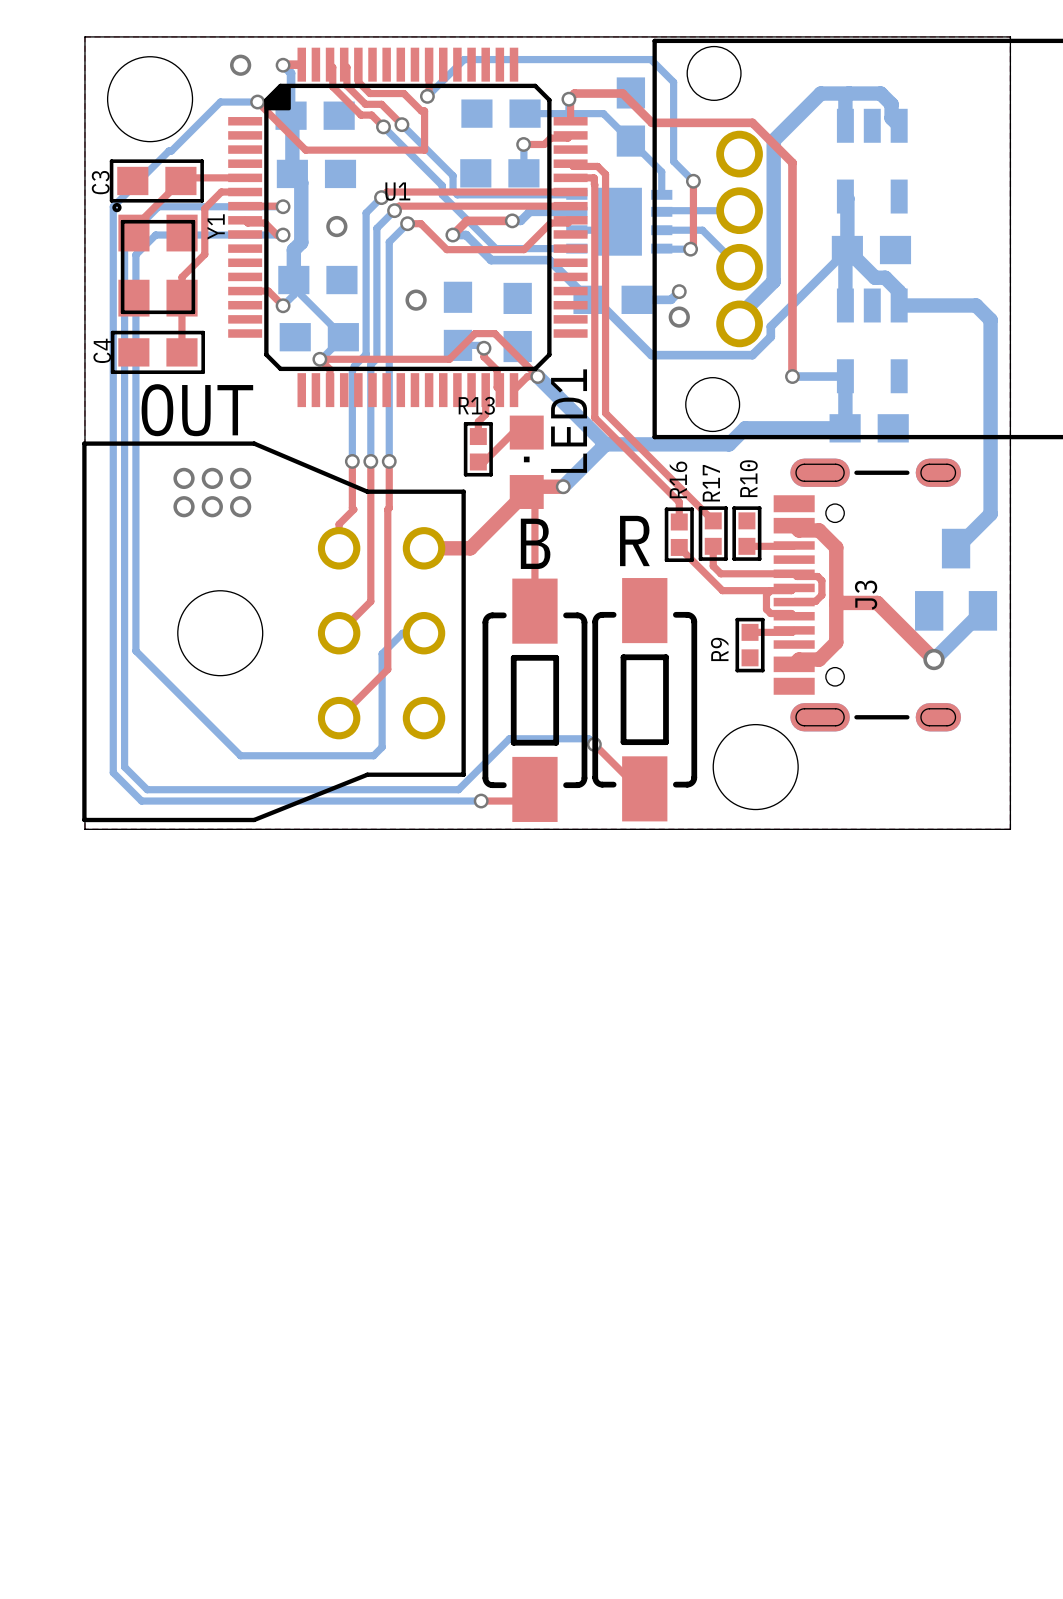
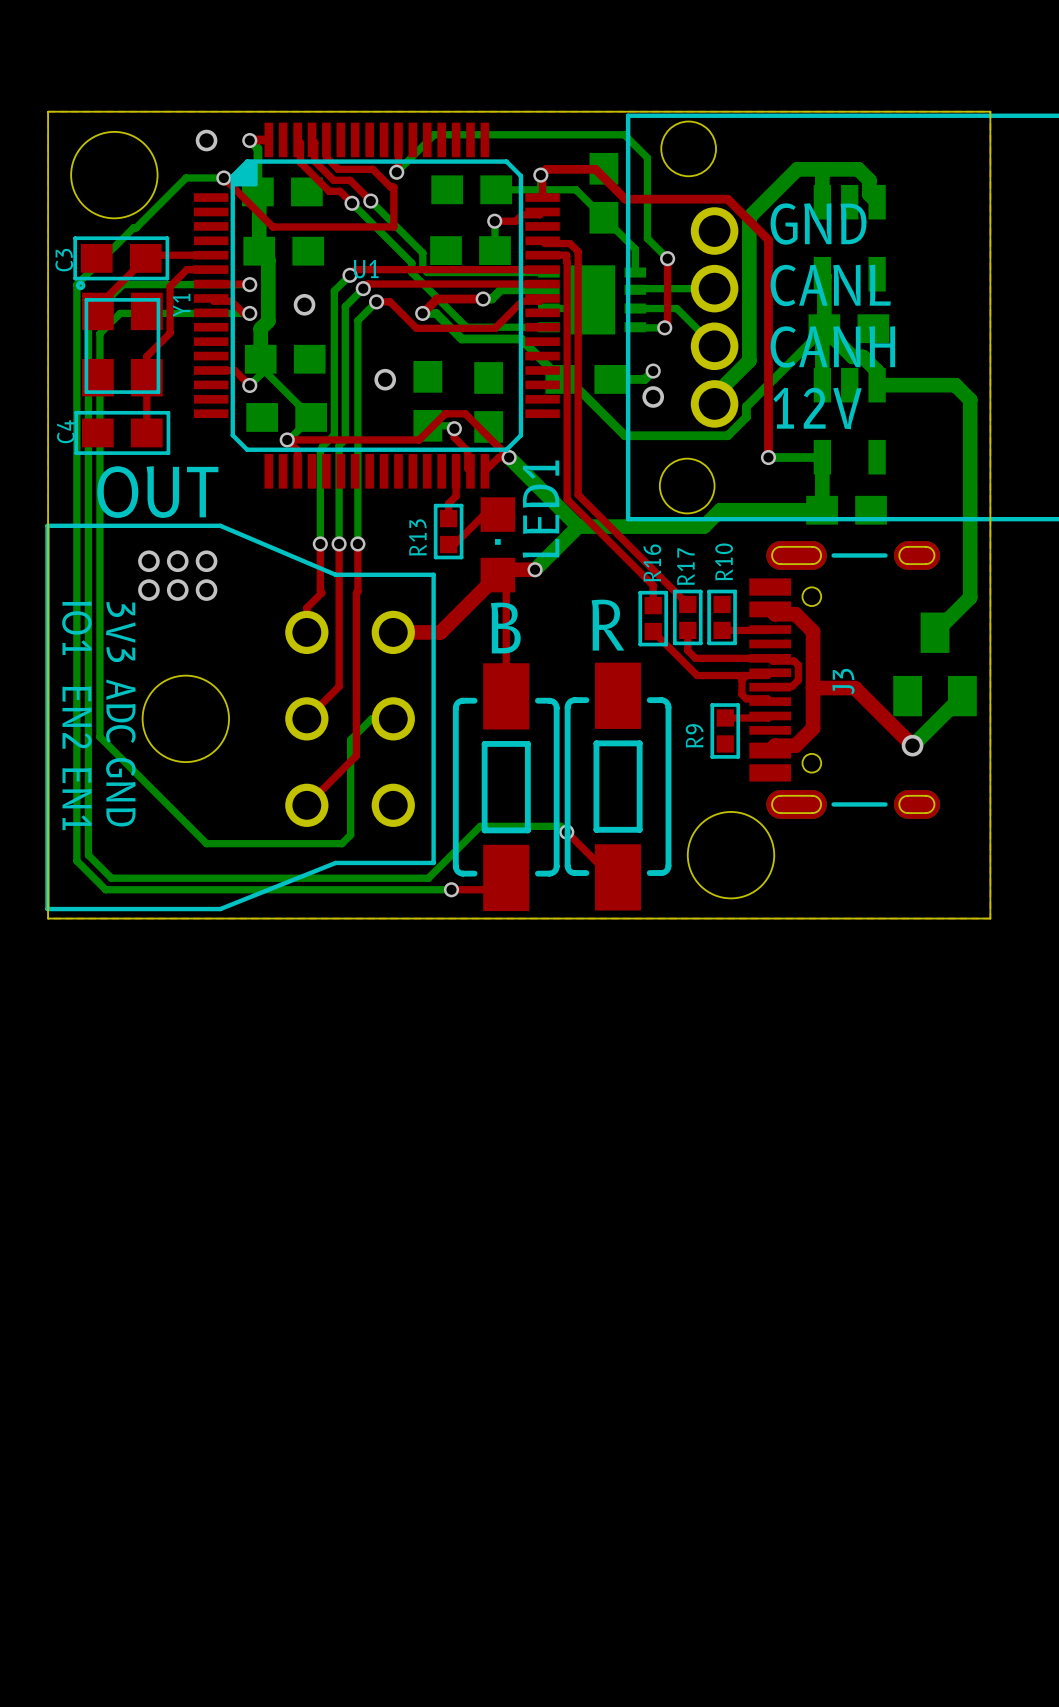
text: none -> GND (818, 223)
text: none -> CANL (830, 285)
text: none -> CANH (832, 346)
text: none -> 12V (817, 408)
R13 name rotation: 0° (476, 405) -> 90° counterclockwise (417, 537)
text: none -> 3V3 ADC GND (120, 714)
text: none -> IO1 EN2 EN1 (76, 715)

